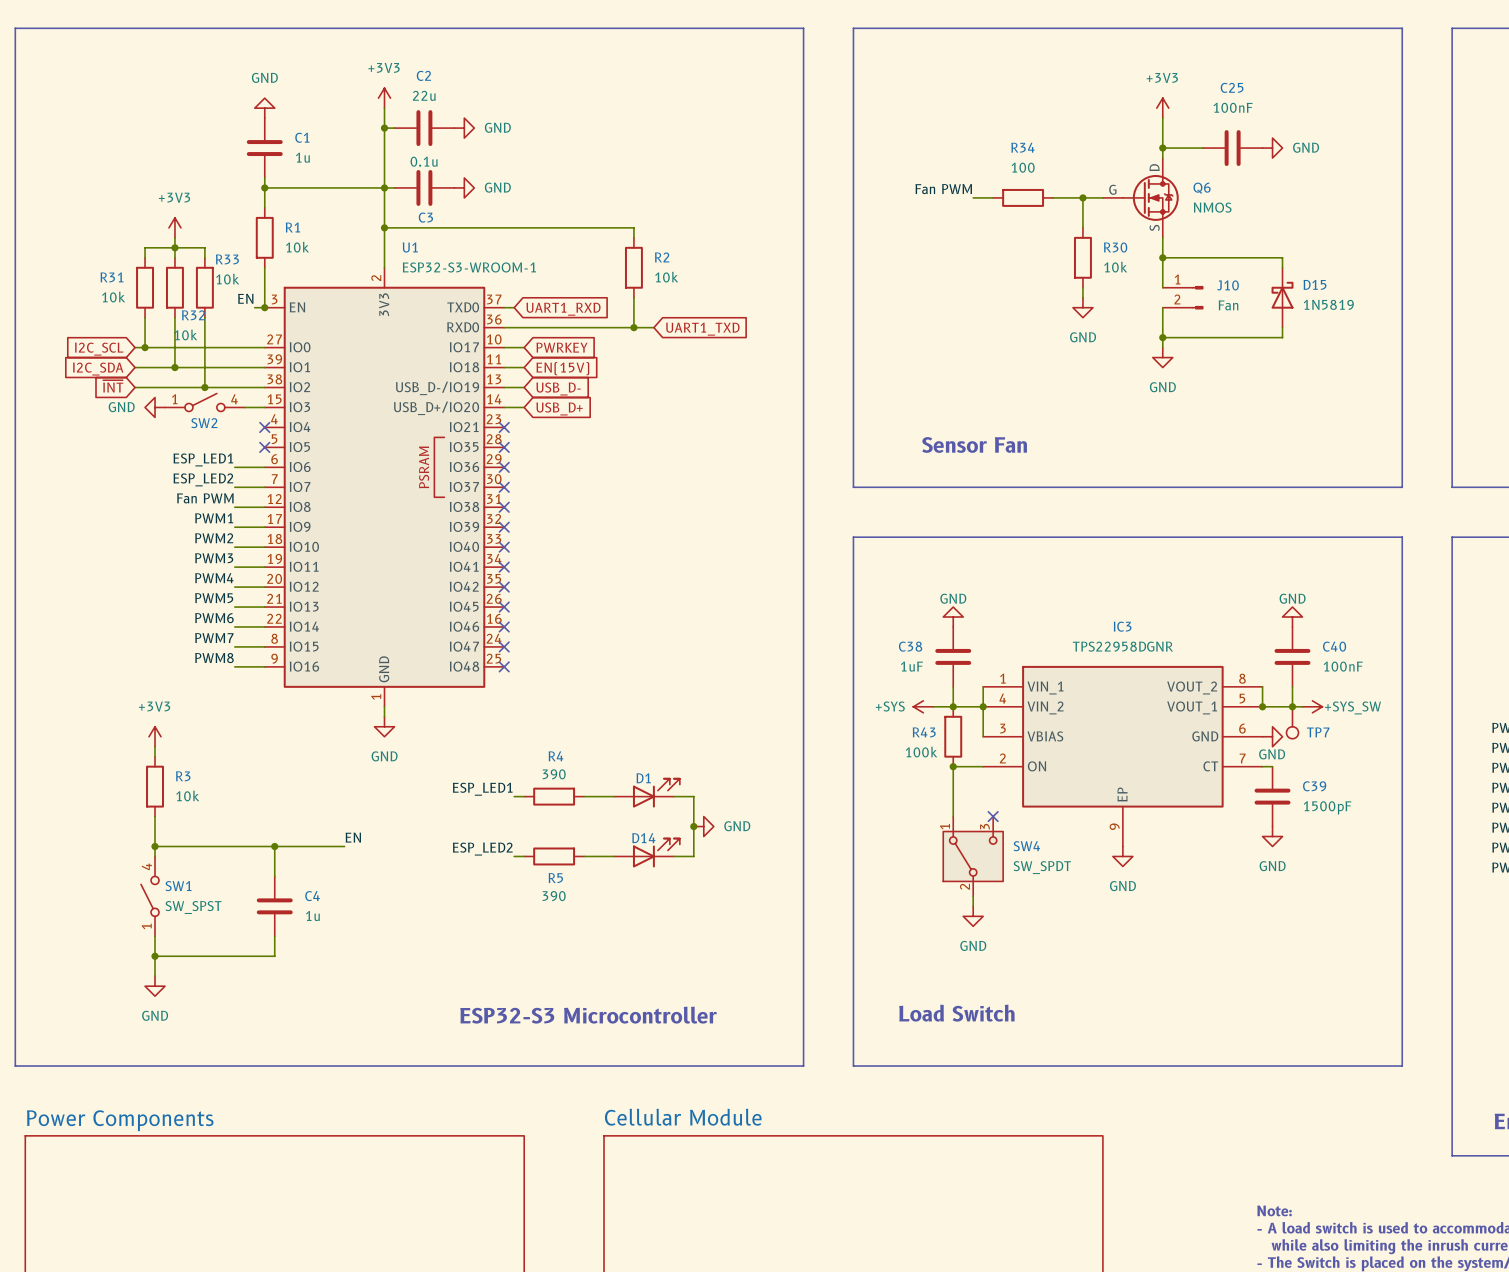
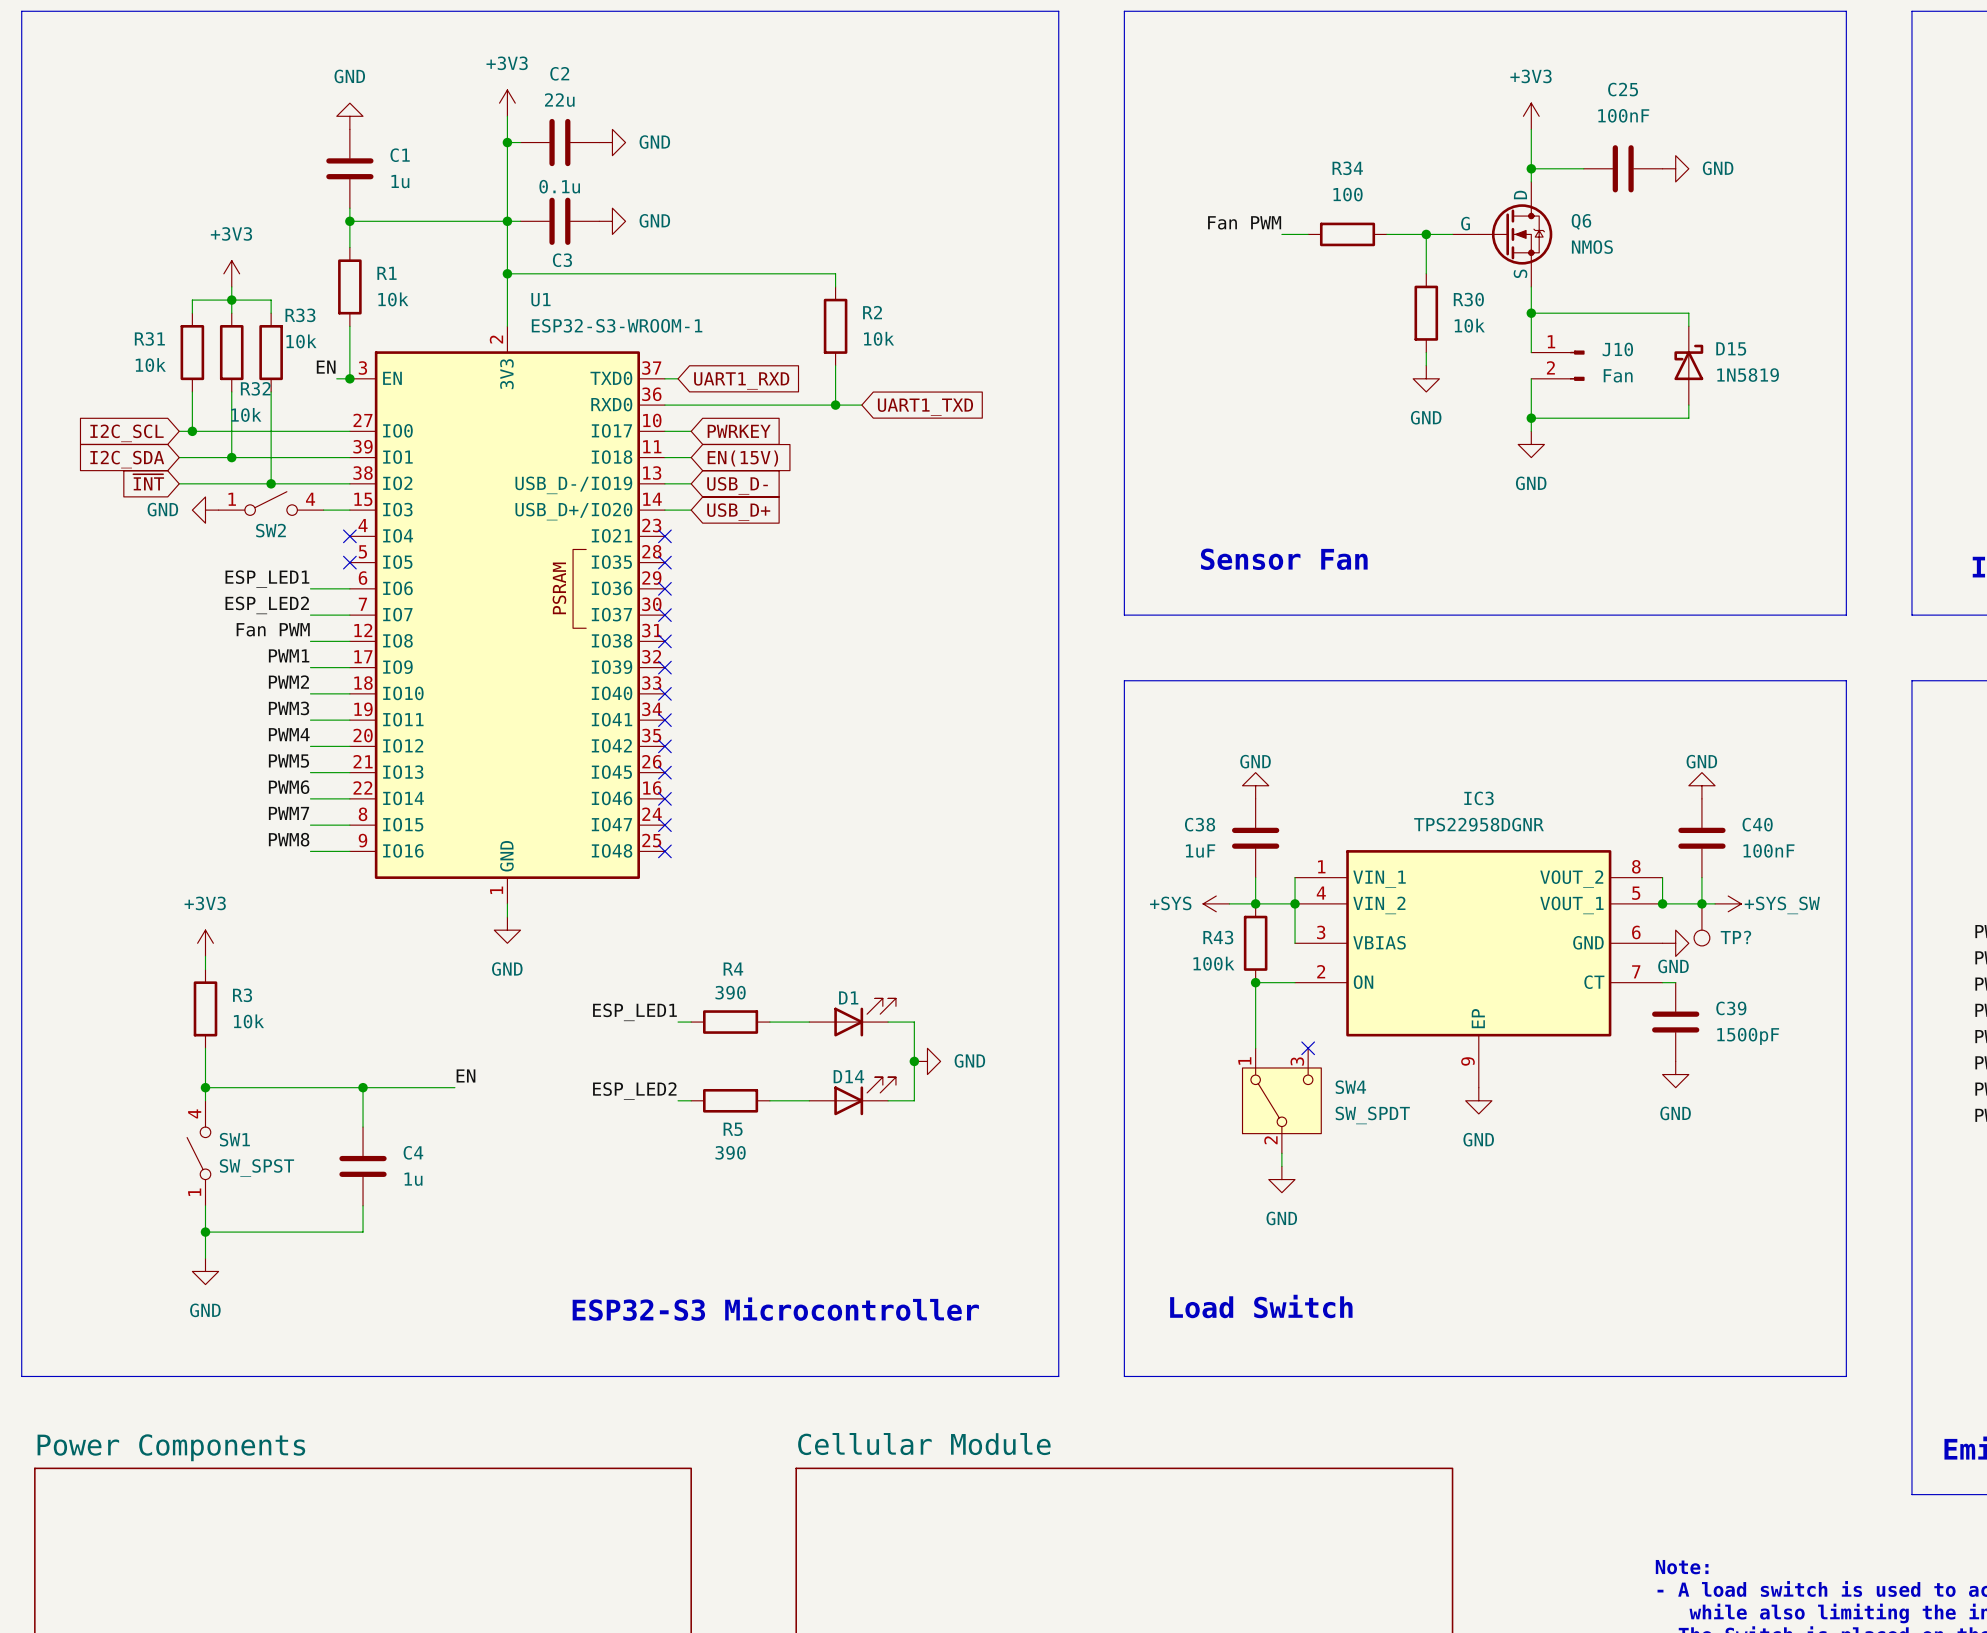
TP7 name: TP7 (1318, 732) -> TP? (1735, 937)

